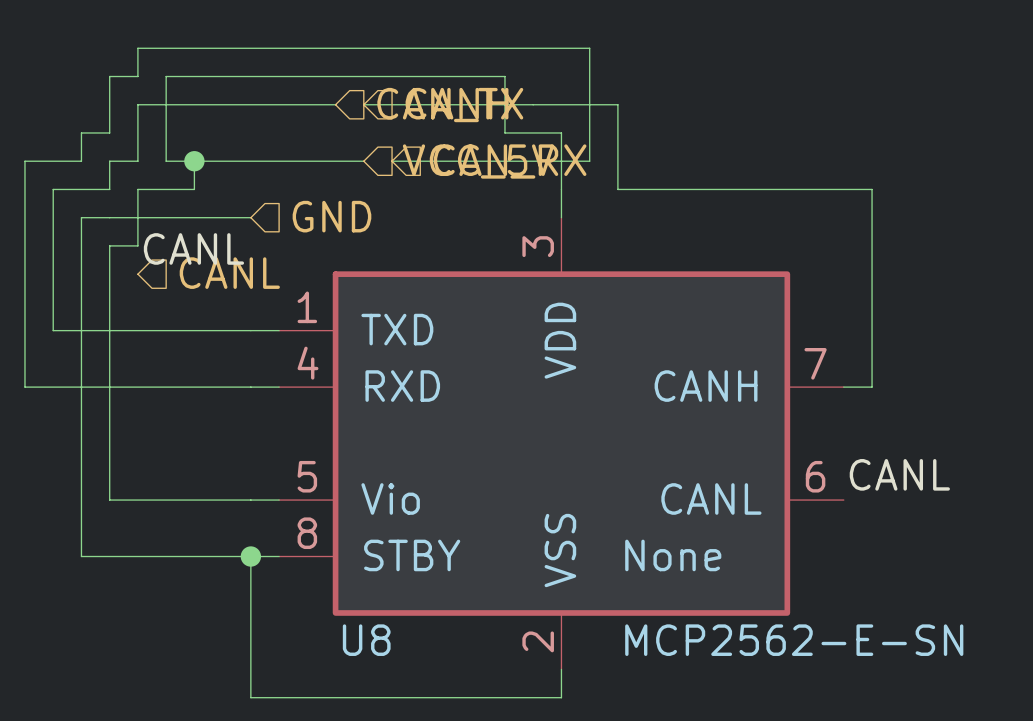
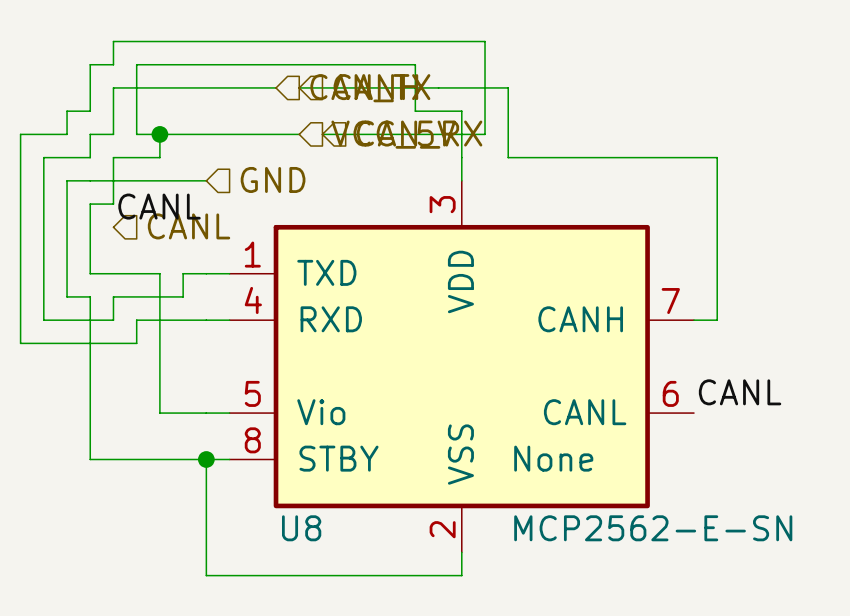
wire: (53, 330) (109, 330) (109, 358) -> (67, 296) (90, 296)
wire: (194, 330) (222, 330) -> (113, 320) (113, 296) (183, 296) (183, 273)
wire: none -> (159, 273) (159, 413)
wire: (81, 358) (81, 556) (109, 556) -> none
wire: (24, 387) (53, 387) -> (43, 273) (43, 320)
wire: (137, 387) (166, 387) -> (20, 320) (20, 343) (136, 343) (136, 320)
wire: (109, 500) (194, 500) -> (90, 413) (90, 459)

